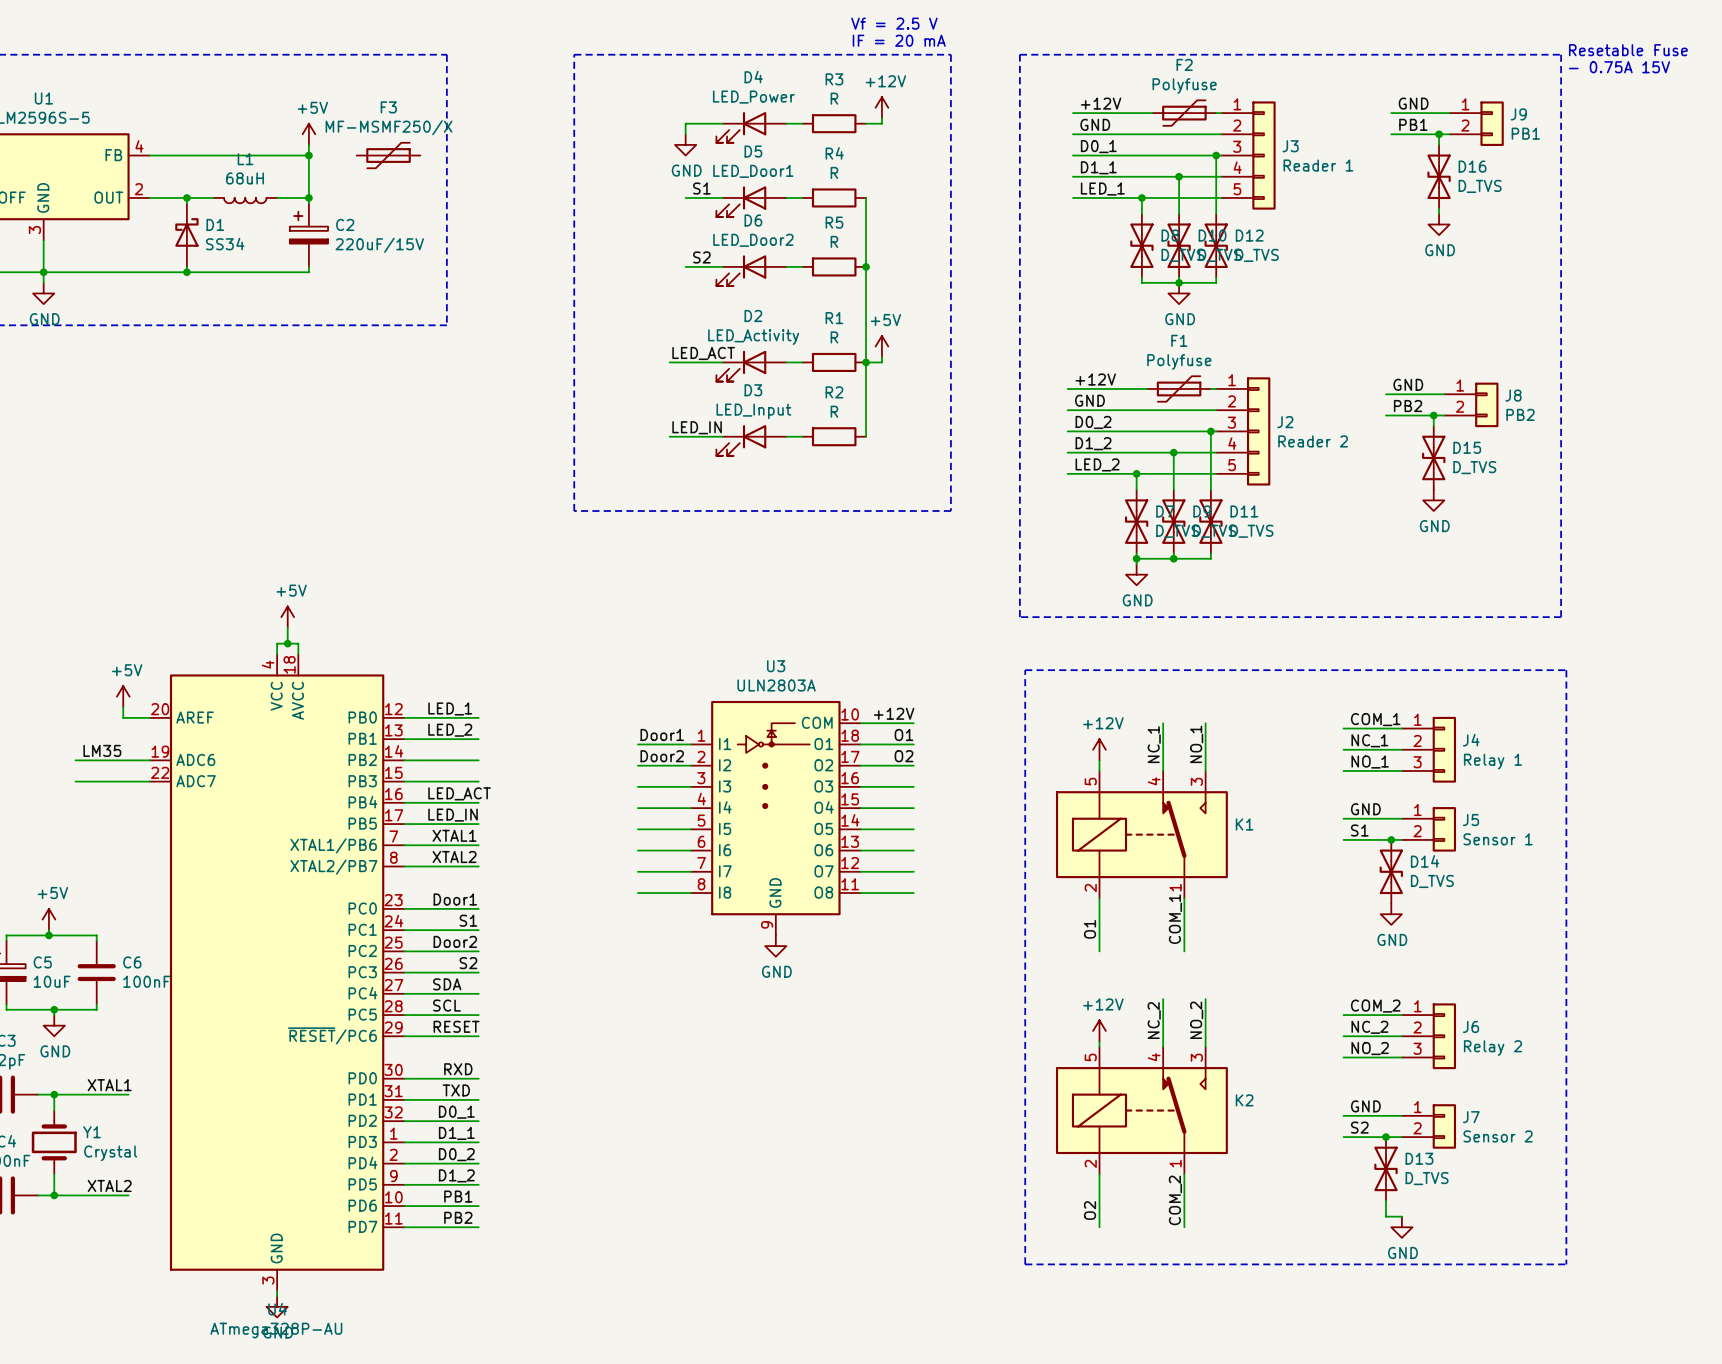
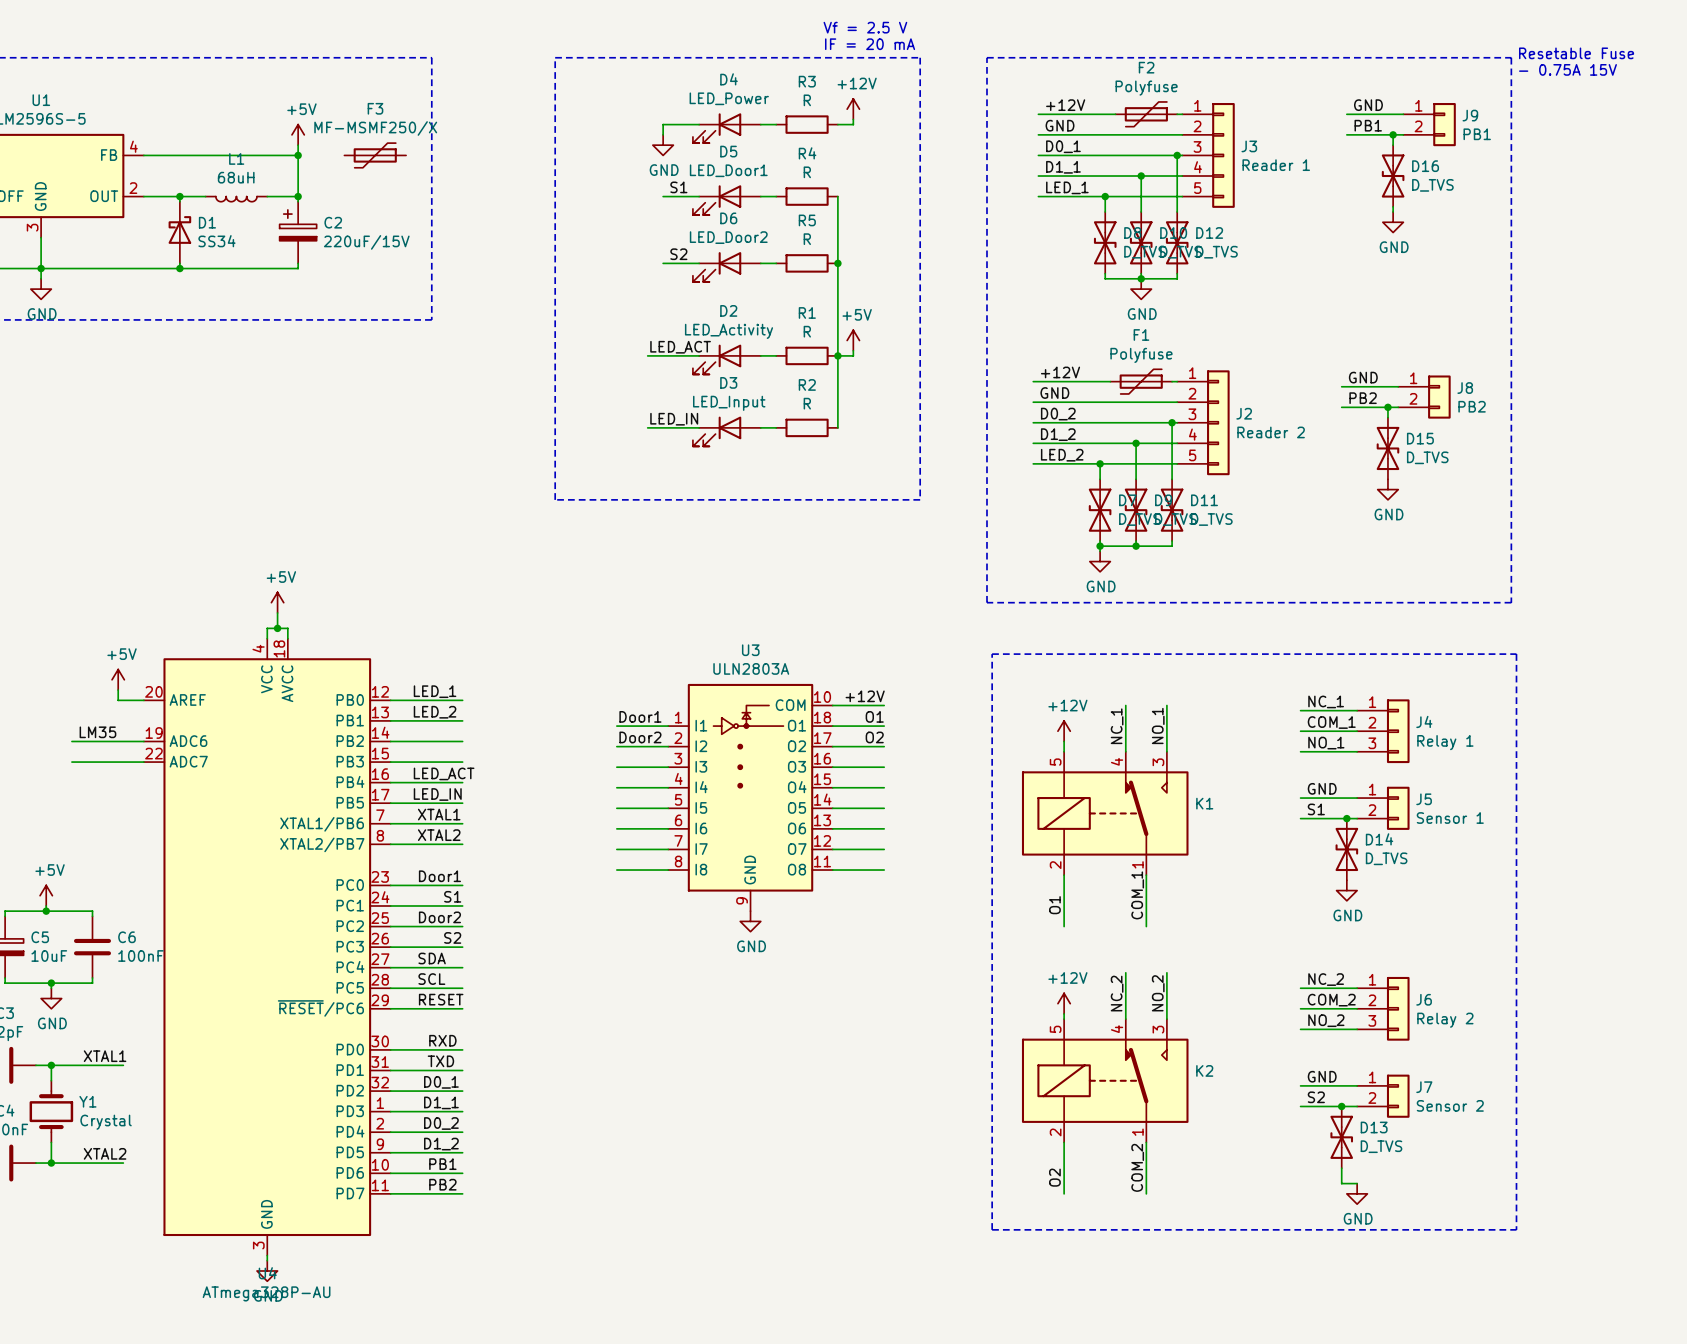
label: COM_1 (1375, 719) -> NC_1 (1326, 701)
label: NC_1 (1369, 740) -> COM_1 (1331, 722)
label: COM_2 (1375, 1006) -> NC_2 (1326, 979)
label: NC_2 (1369, 1027) -> COM_2 (1331, 1000)

